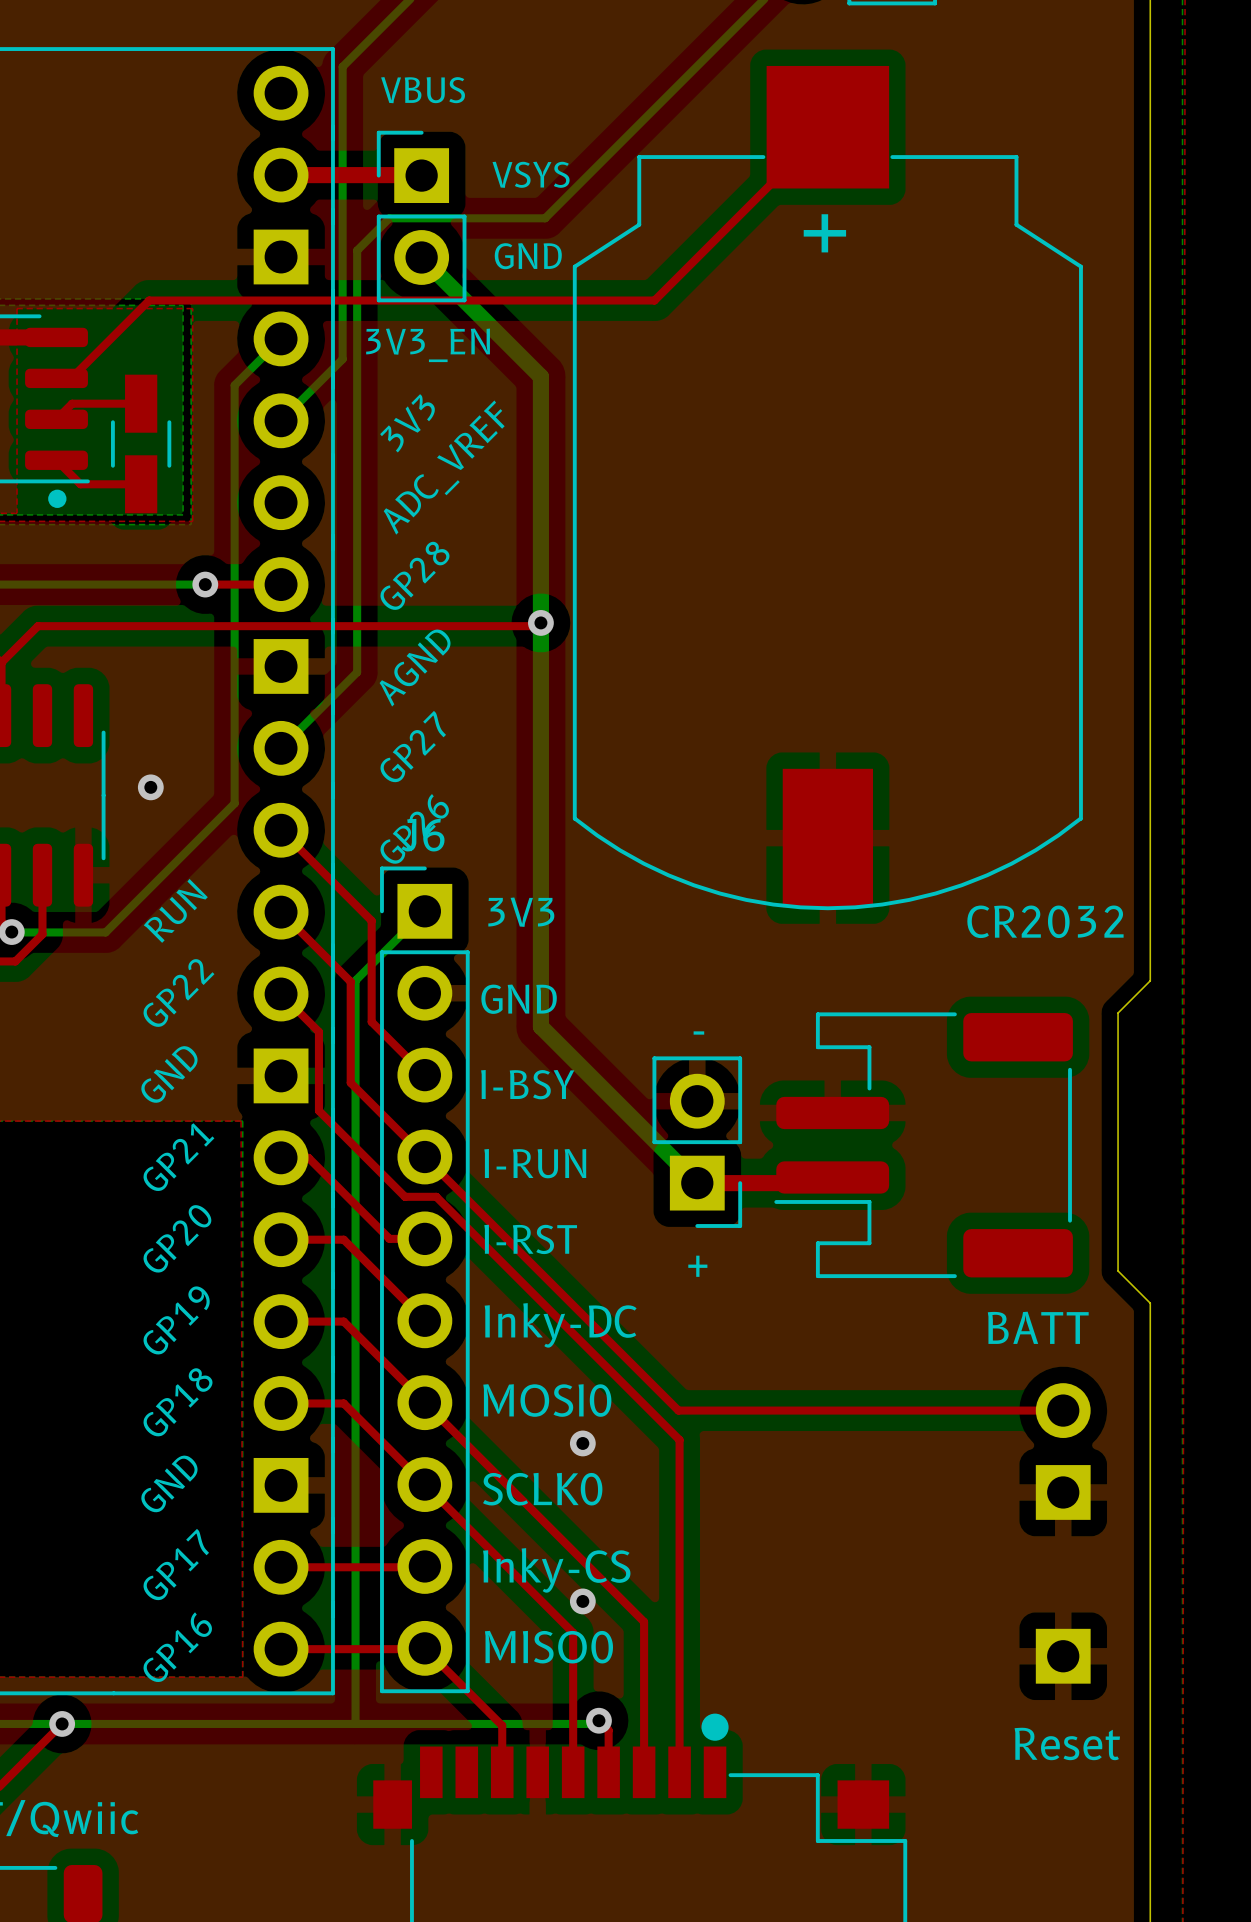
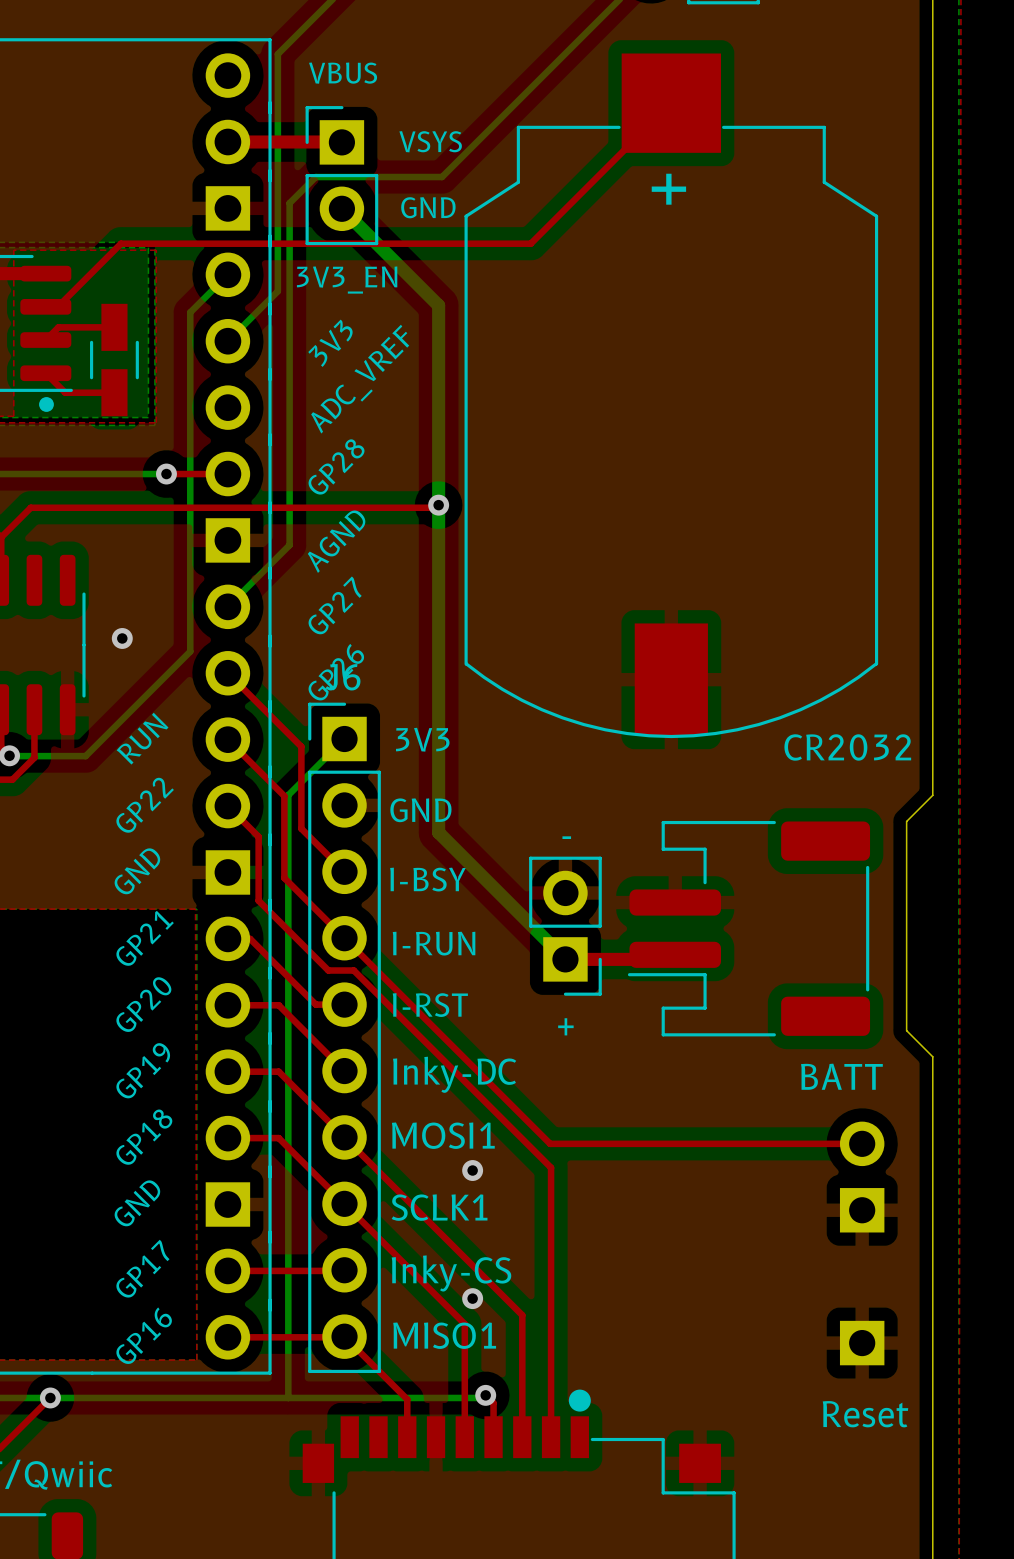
text: MOSI0 (547, 1400) -> MOSI1 (443, 1135)
text: SCLK0 (542, 1489) -> SCLK1 (439, 1207)
text: MISO0 (548, 1647) -> MISO1 (444, 1335)

